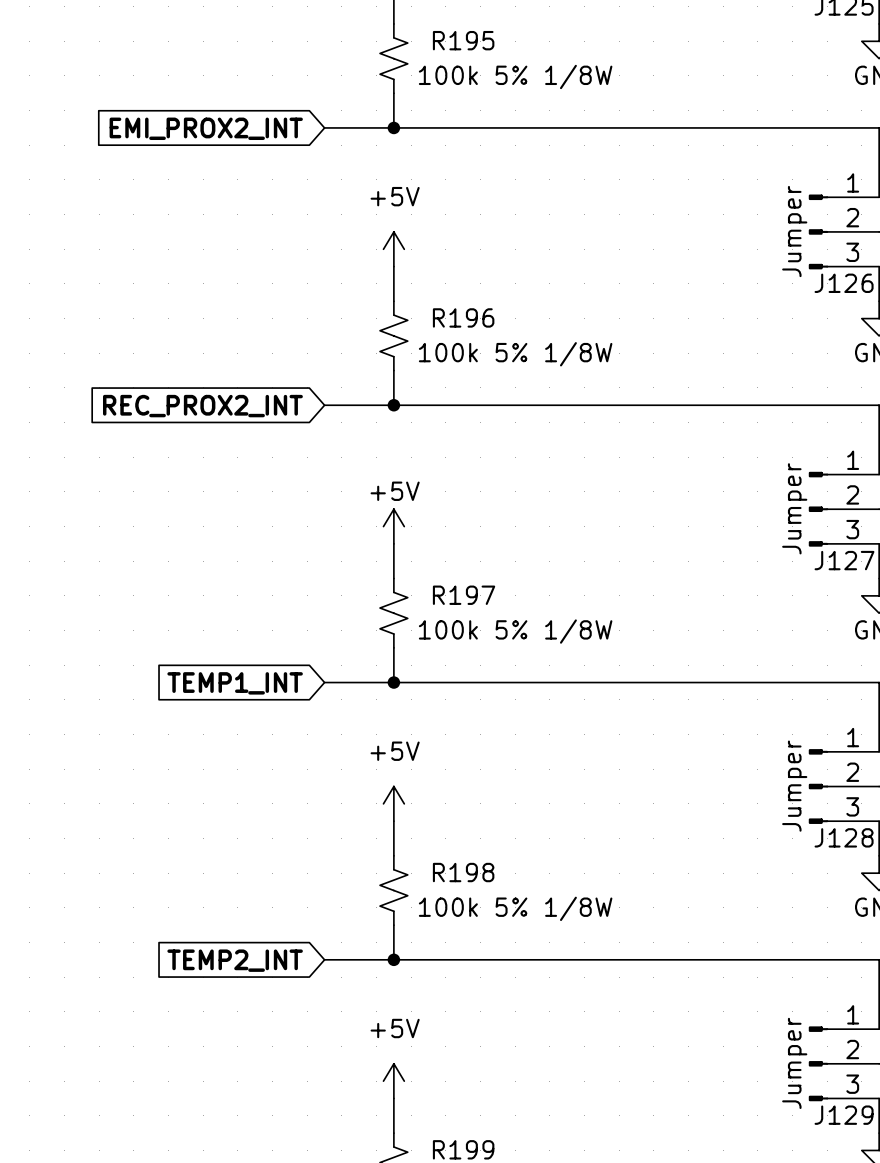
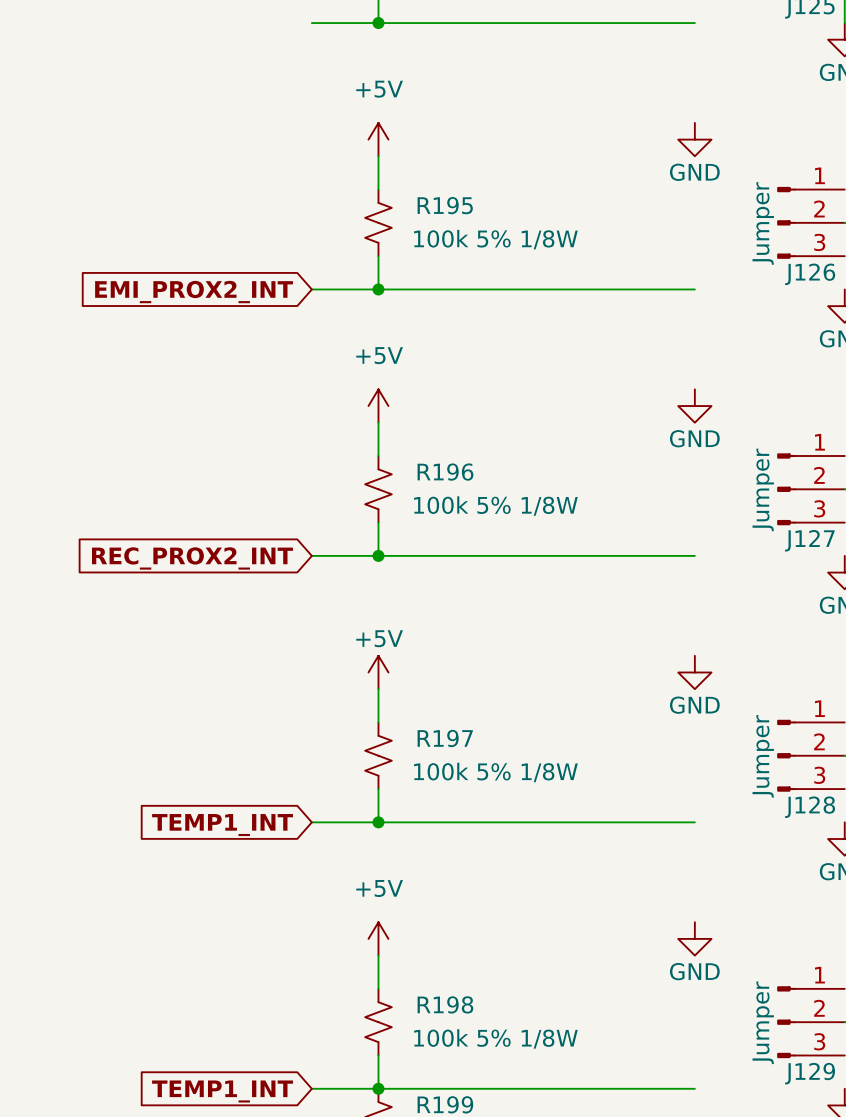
wire: none -> (311, 23) (694, 23)
junction: none -> (378, 23)
R195 position: (393, 58) -> (378, 222)
wire: (393, 93) (393, 127) -> (378, 156) (378, 189)
wire: (324, 127) (879, 127) (879, 197) -> none
junction: (393, 127) -> none
global label position: EMI_PROX2_INT (206, 128) -> EMI_PROX2_INT (194, 292)
power symbol: none -> +5V (378, 139)
power symbol: none -> GND (694, 139)
power symbol: +5V (393, 249) -> none
wire: (879, 266) (879, 301) -> none
wire: none -> (311, 289) (694, 289)
junction: none -> (378, 289)
R196 position: (393, 335) -> (378, 489)
wire: (393, 370) (393, 405) -> (378, 422) (378, 456)
wire: (324, 405) (879, 405) (879, 474) -> none
junction: (393, 405) -> none
global label position: REC_PROX2_INT (202, 406) -> REC_PROX2_INT (192, 558)
power symbol: none -> +5V (378, 406)
power symbol: none -> GND (694, 406)
power symbol: +5V (393, 526) -> none
wire: (879, 543) (879, 578) -> none
wire: none -> (311, 555) (694, 555)
junction: none -> (378, 555)
R197 position: (393, 613) -> (378, 755)
wire: (393, 647) (393, 682) -> (378, 689) (378, 722)
wire: (324, 682) (879, 682) (879, 751) -> none
junction: (393, 682) -> none
global label position: TEMP1_INT (235, 683) -> TEMP1_INT (222, 825)
power symbol: none -> +5V (378, 672)
power symbol: none -> GND (694, 672)
power symbol: +5V (393, 803) -> none
wire: (879, 821) (879, 855) -> none
wire: none -> (311, 822) (694, 822)
junction: none -> (378, 822)
R198 position: (393, 890) -> (378, 1022)
wire: (393, 925) (393, 959) -> (378, 955) (378, 988)
wire: (324, 959) (879, 959) (879, 1029) -> none
junction: (393, 959) -> none
global label: TEMP2_INT (235, 960) -> none
power symbol: none -> +5V (378, 938)
power symbol: none -> GND (694, 938)
power symbol: +5V (393, 1081) -> none
wire: (879, 1098) (879, 1133) -> none
global label: none -> TEMP1_INT (222, 1091)
wire: none -> (311, 1088) (694, 1088)
junction: none -> (378, 1088)

